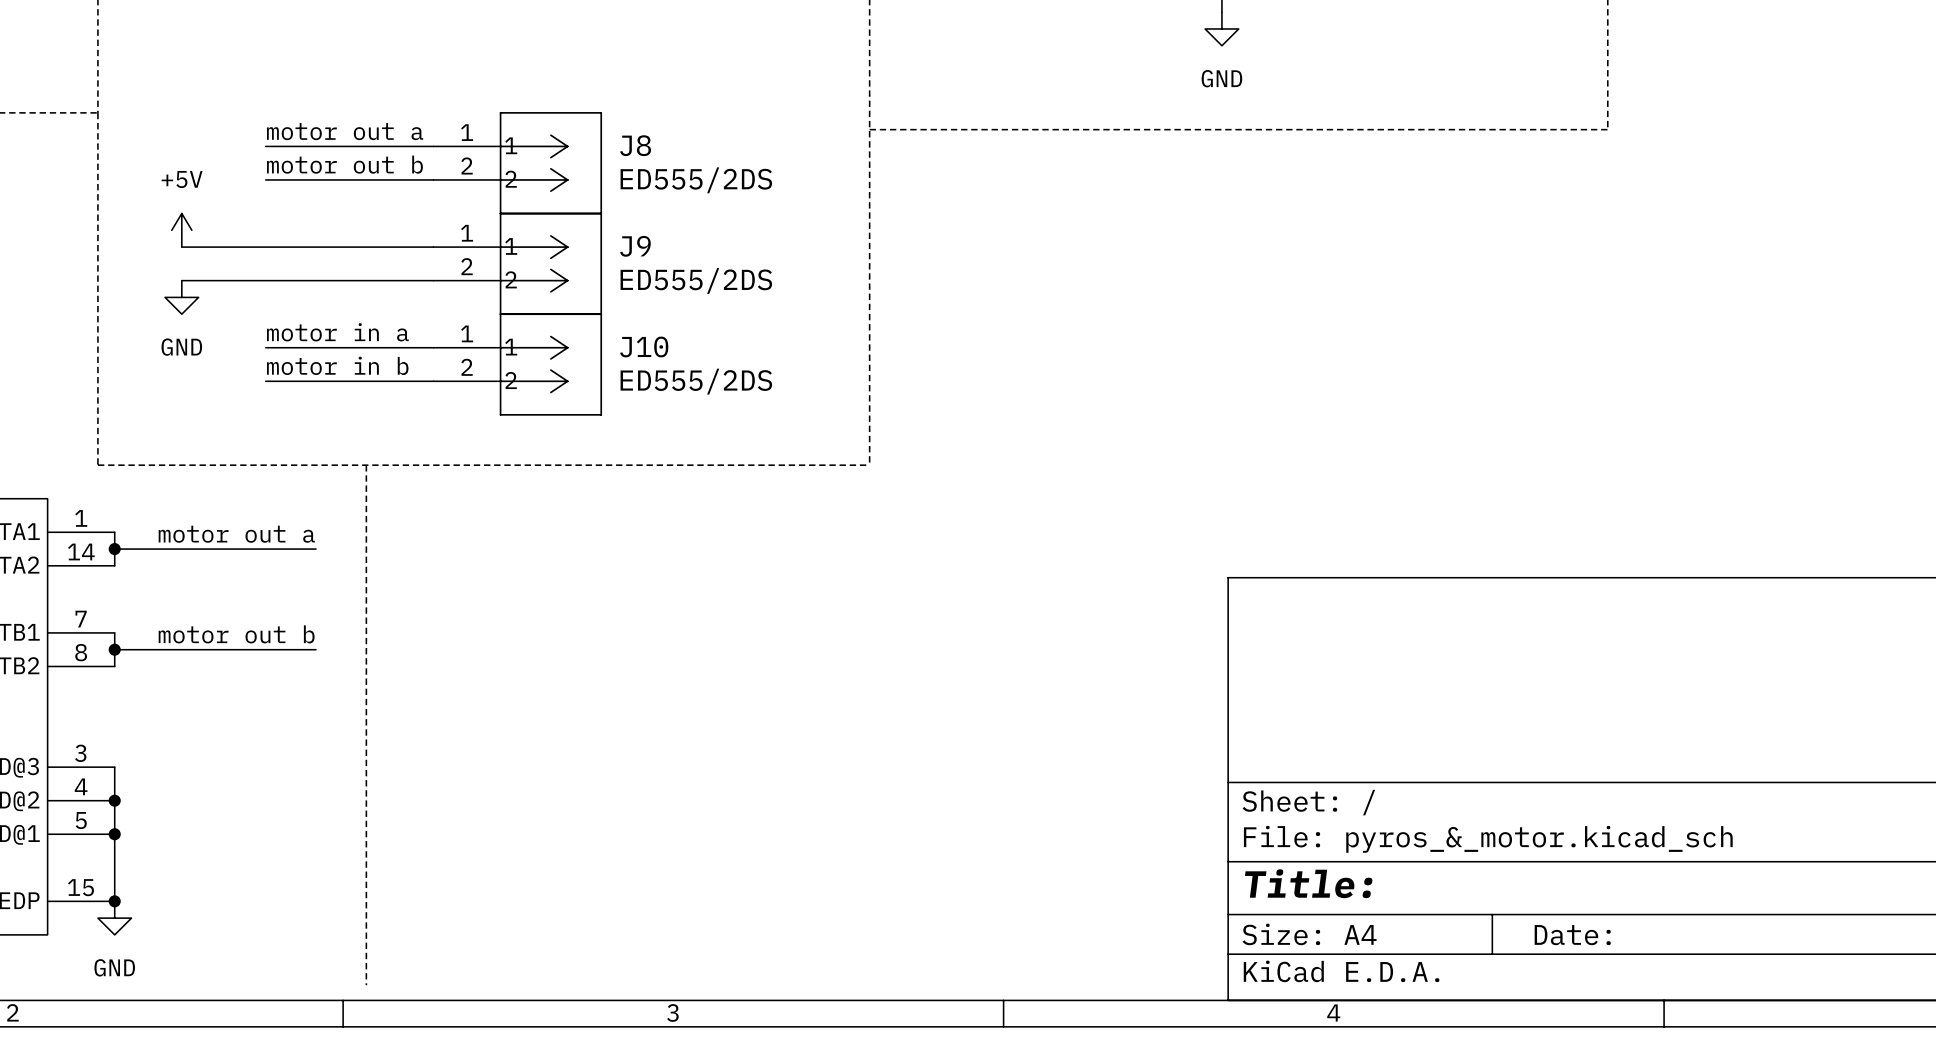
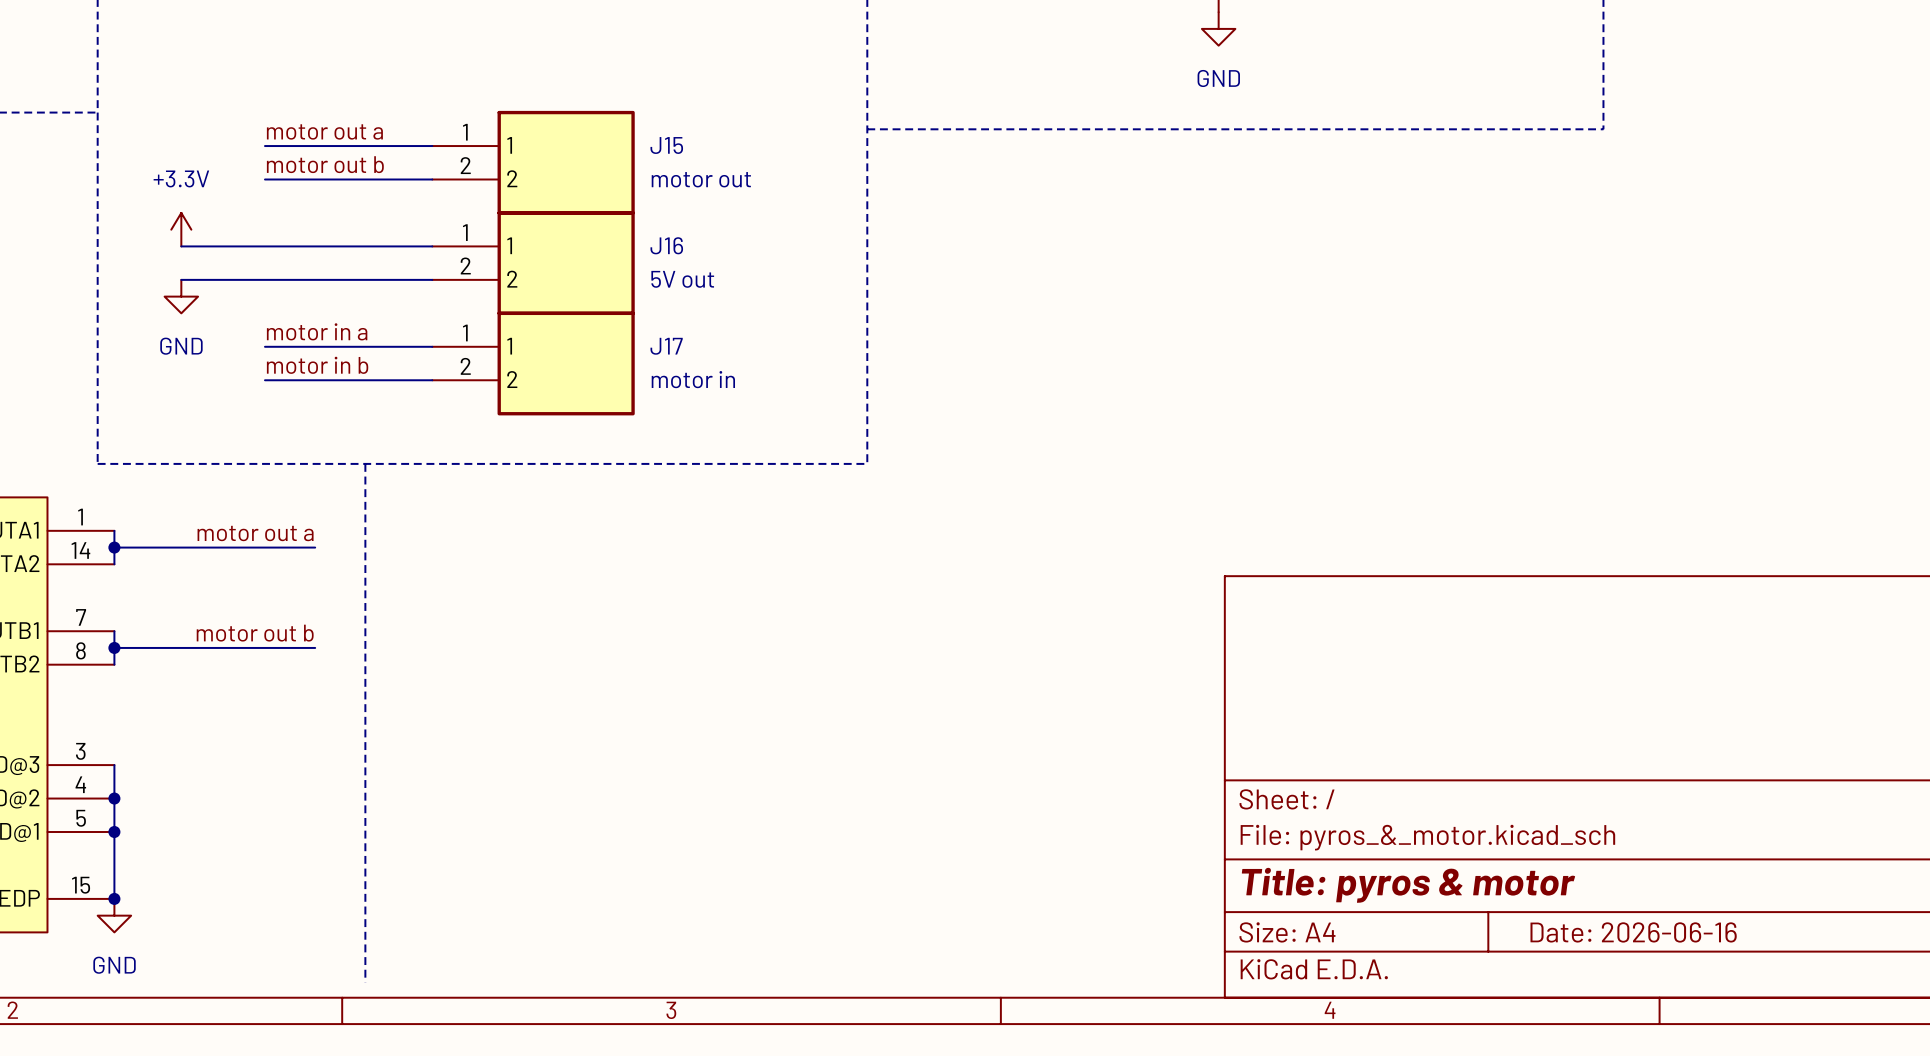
J8: ED555/2DS (517, 163) -> none
J15: none -> motor out (533, 162)
power symbol: +5V (181, 230) -> +3.3V (181, 229)
J9: ED555/2DS (517, 263) -> none
J16: none -> 5V out (533, 263)
J10: ED555/2DS (517, 364) -> none
J17: none -> motor in (533, 363)
title block: Title: (1308, 883) -> Title: pyros & motor (1408, 885)
title block: Date: (1572, 935) -> Date: 2026-06-16 (1633, 932)

